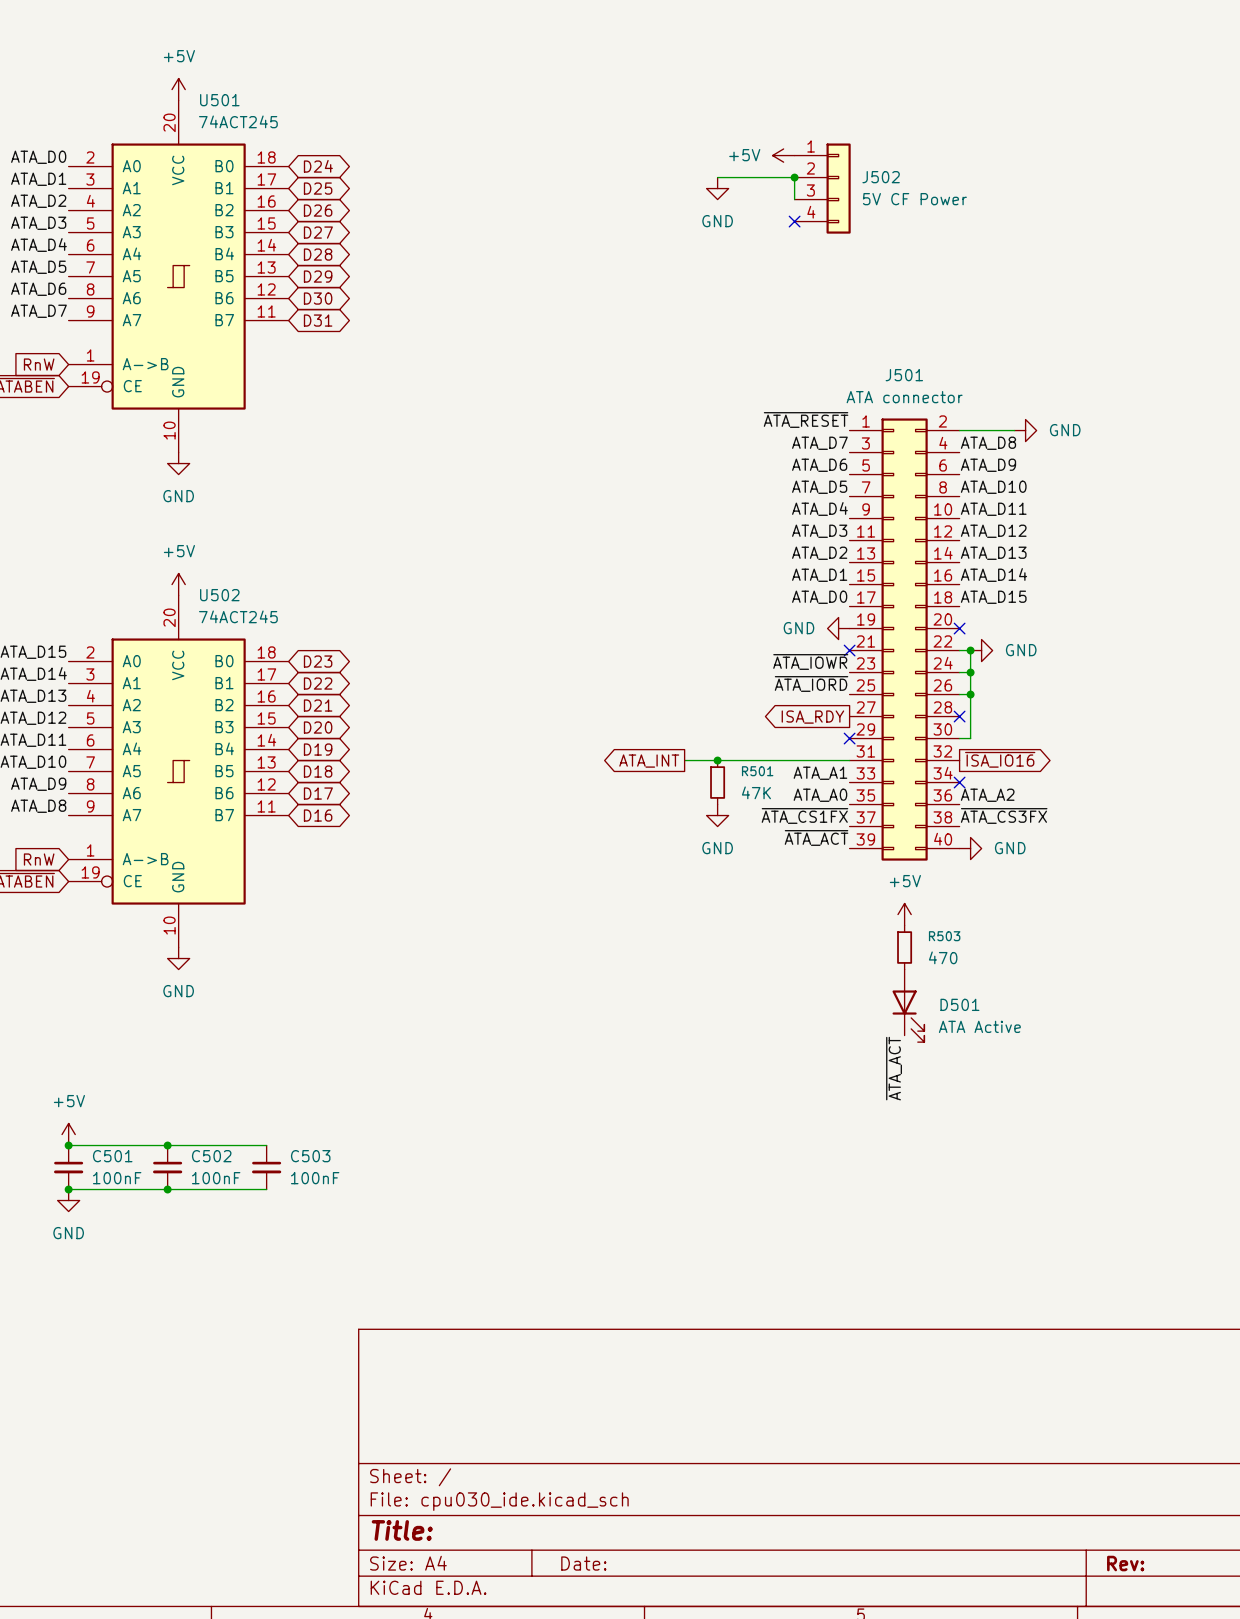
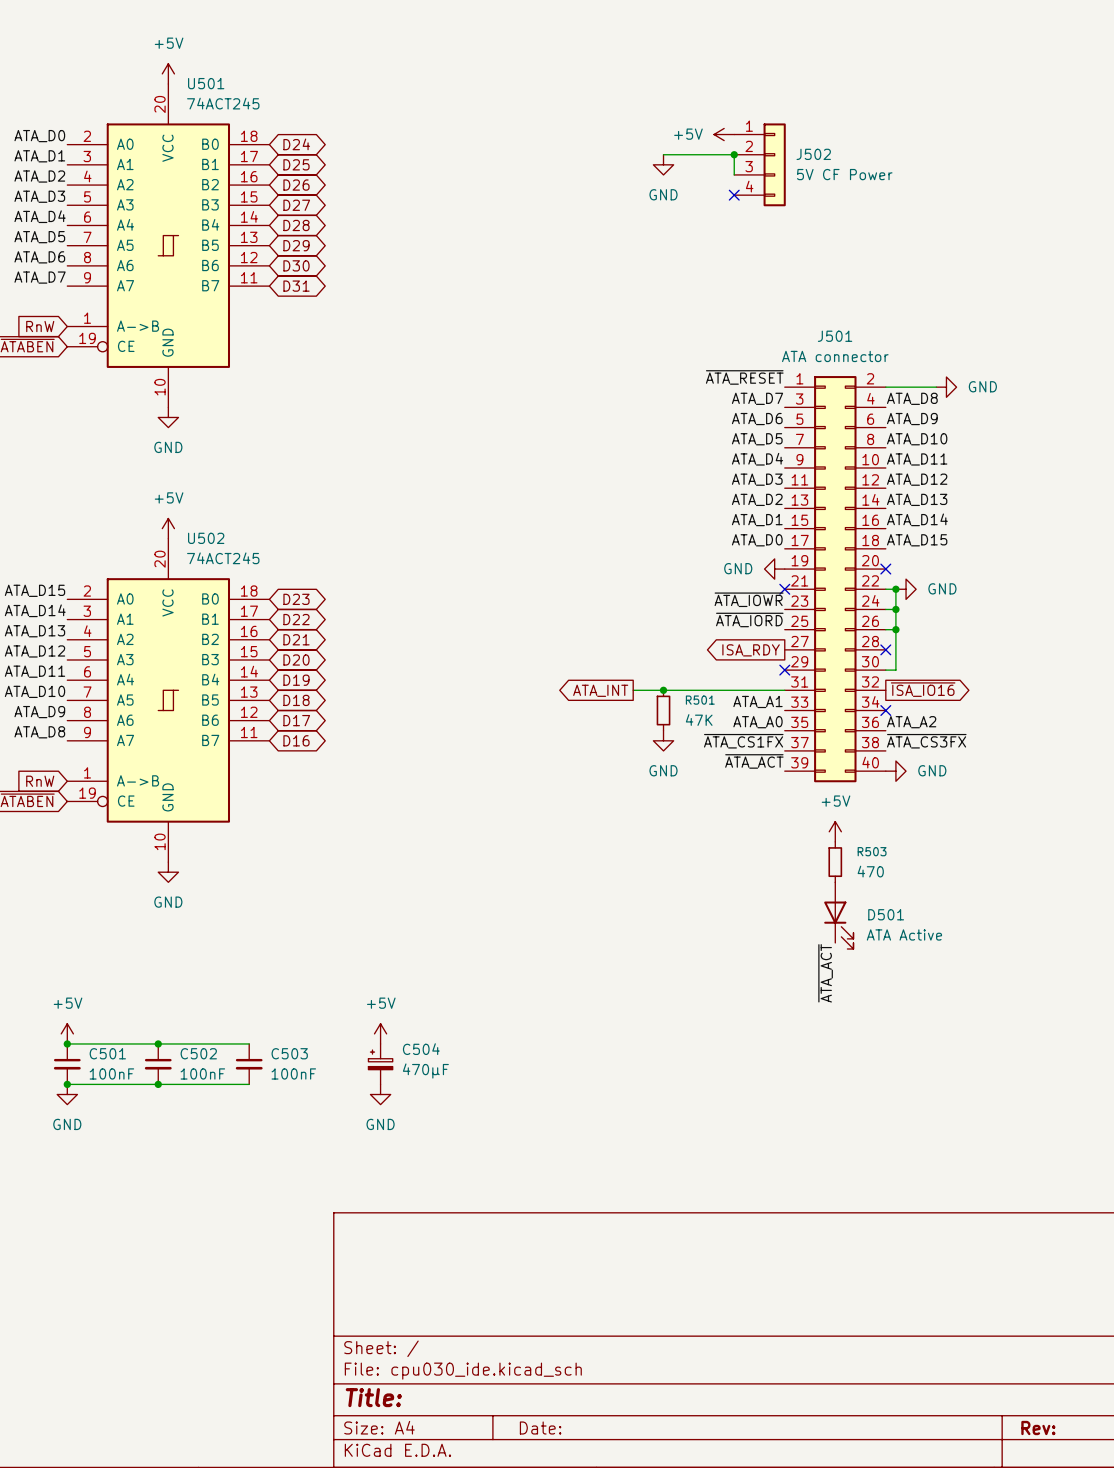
power symbol: none -> +5V (380, 1033)
C504: none -> 470µF (380, 1064)
power symbol: none -> GND (380, 1094)

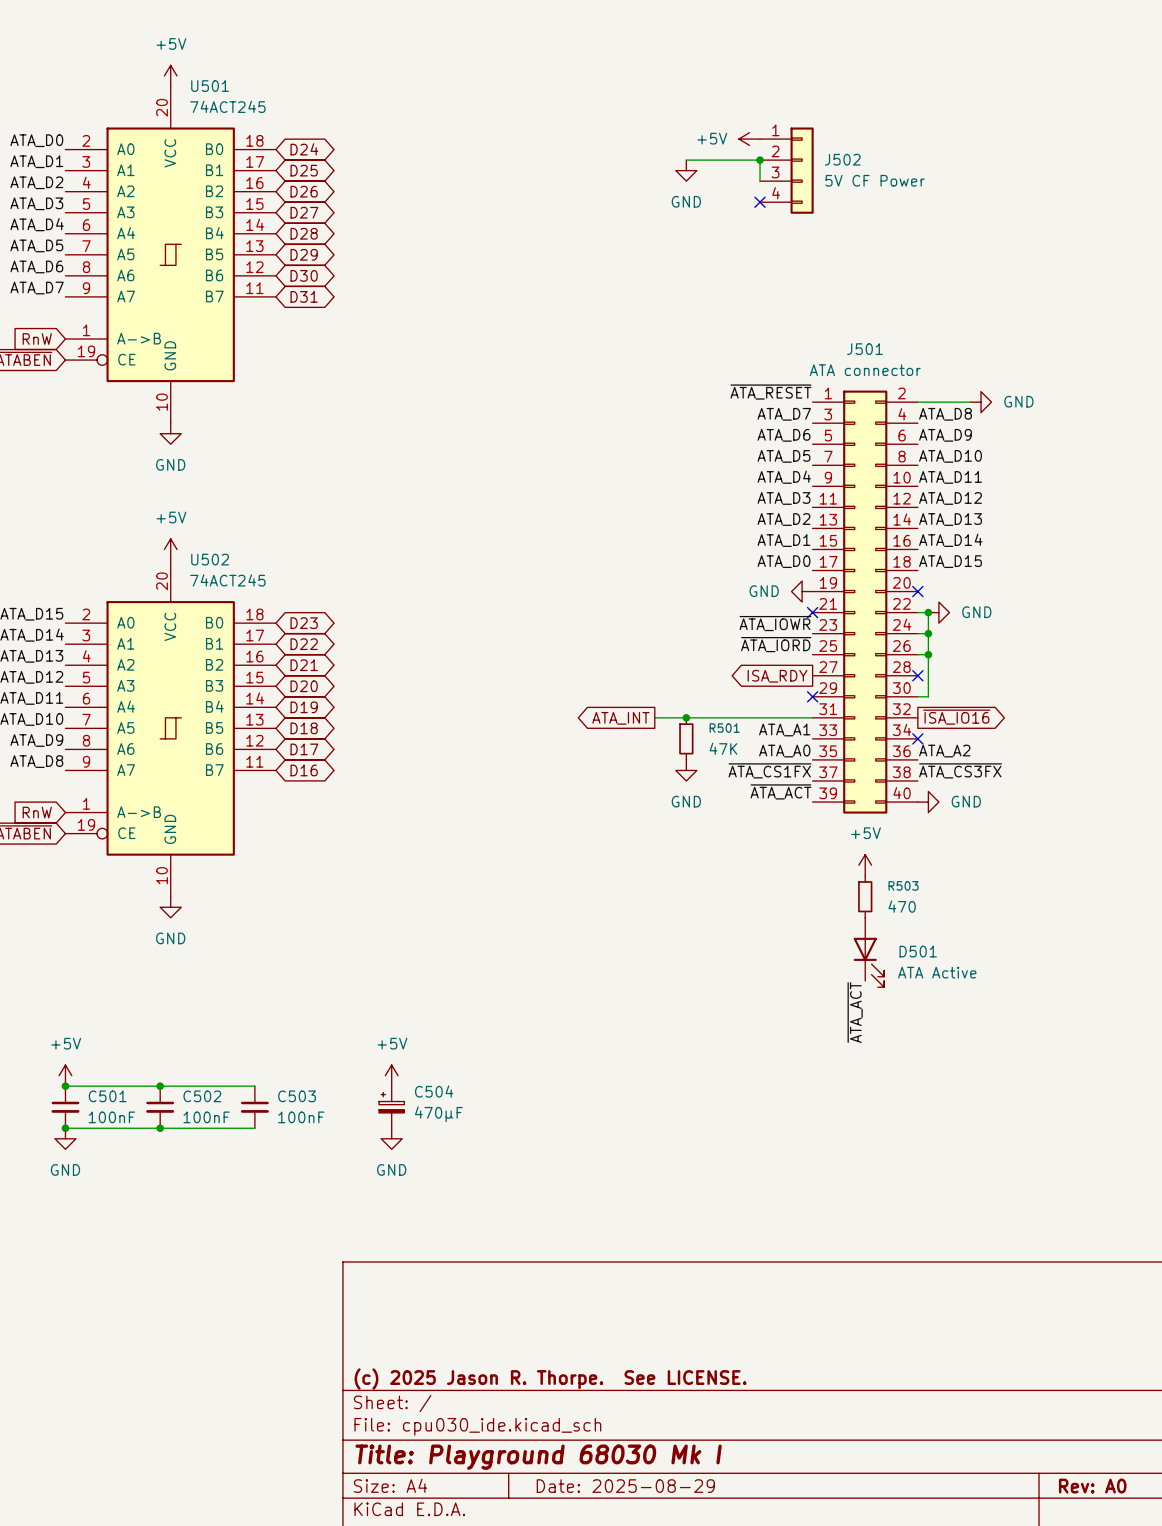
title block: none -> (c) 2025 Jason R. Thorpe. See LICENSE. (550, 1379)
title block: Title: (373, 1397) -> Title: Playground 68030 Mk I (538, 1457)
title block: Date: (540, 1428) -> Date: 2025-08-29 (625, 1486)
title block: Rev: (1038, 1428) -> Rev: A0 (1092, 1486)

